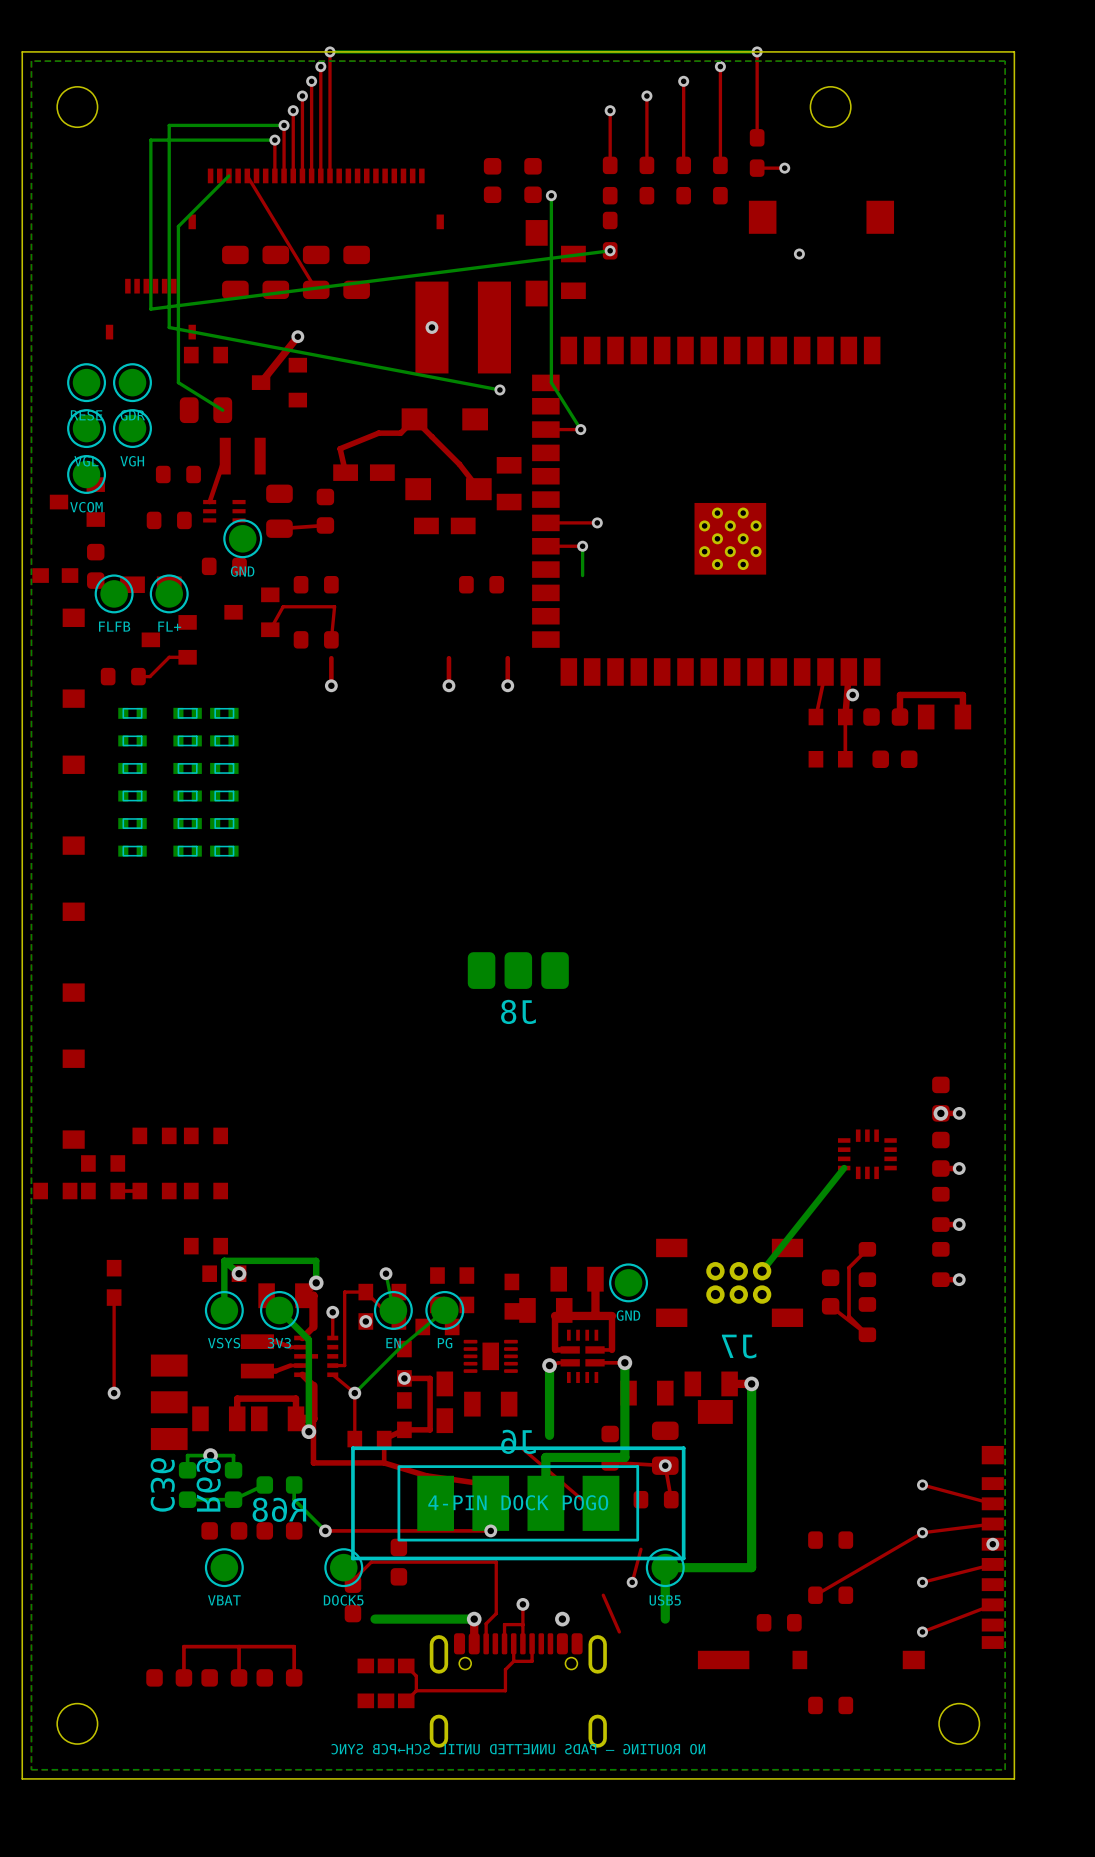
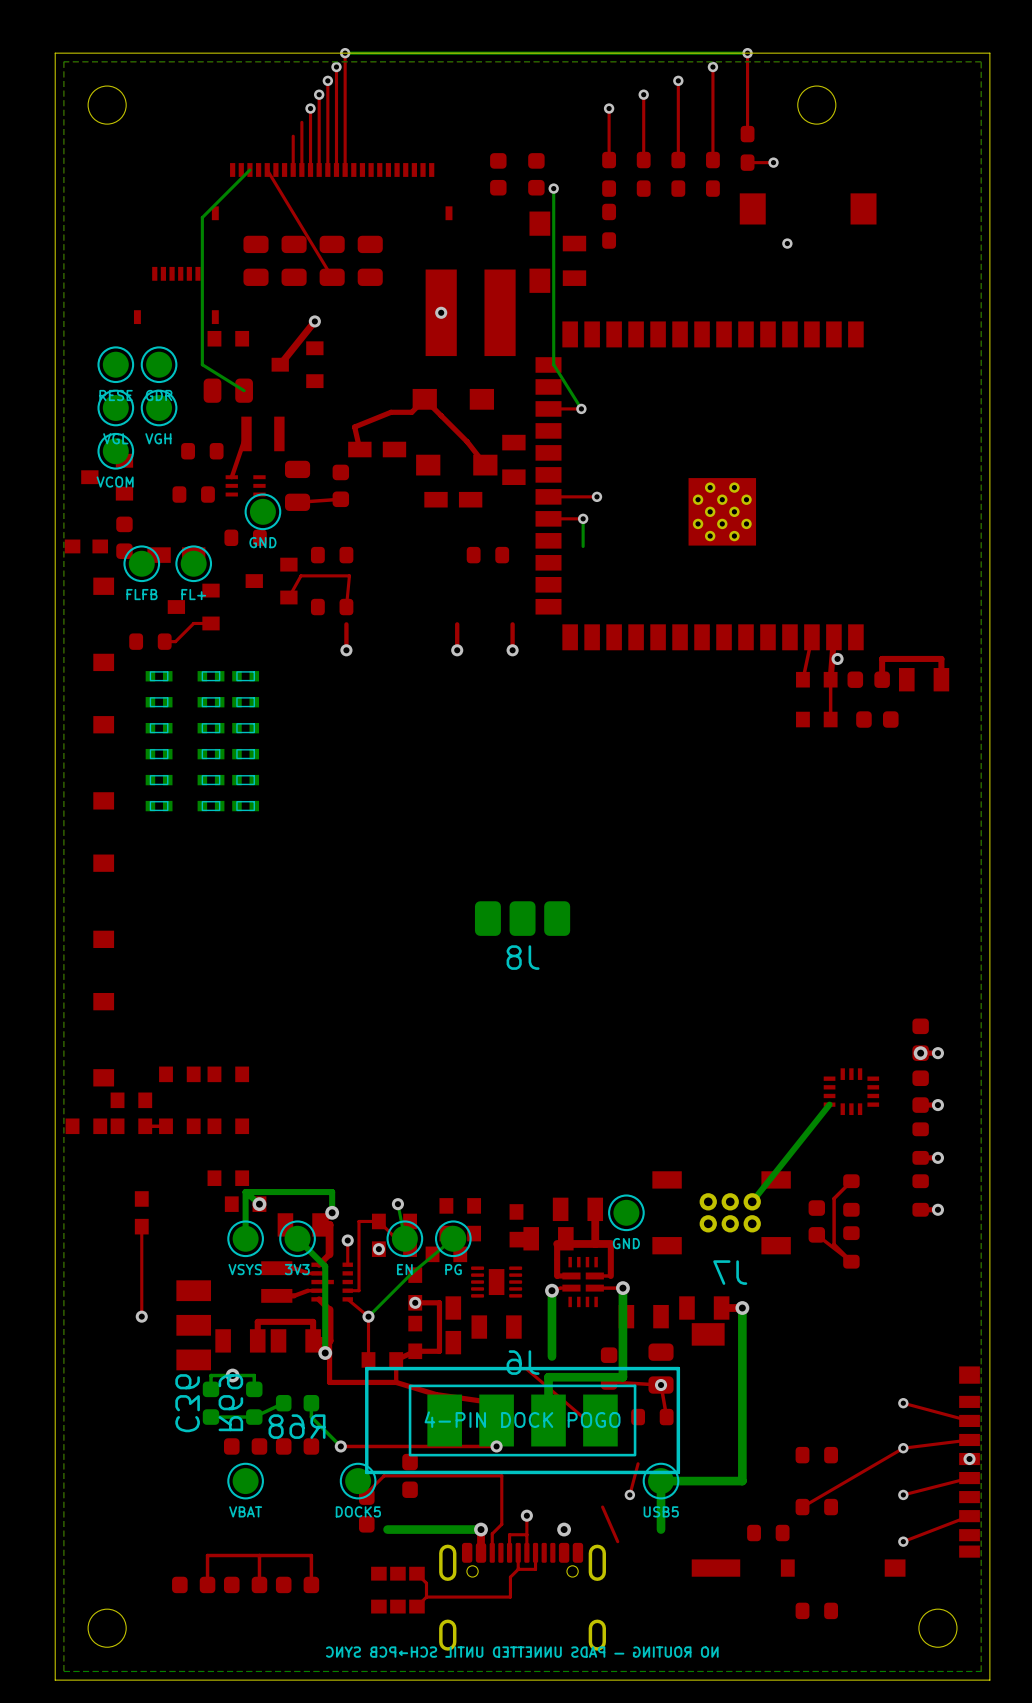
bottom track: (284, 125) (169, 125) (169, 327) (499, 389) -> none
via: (284, 125) -> none
bottom track: (274, 140) (150, 140) (150, 309) (610, 250) -> none
via: (274, 140) -> none
via: (610, 250) -> none
via: (499, 389) -> none

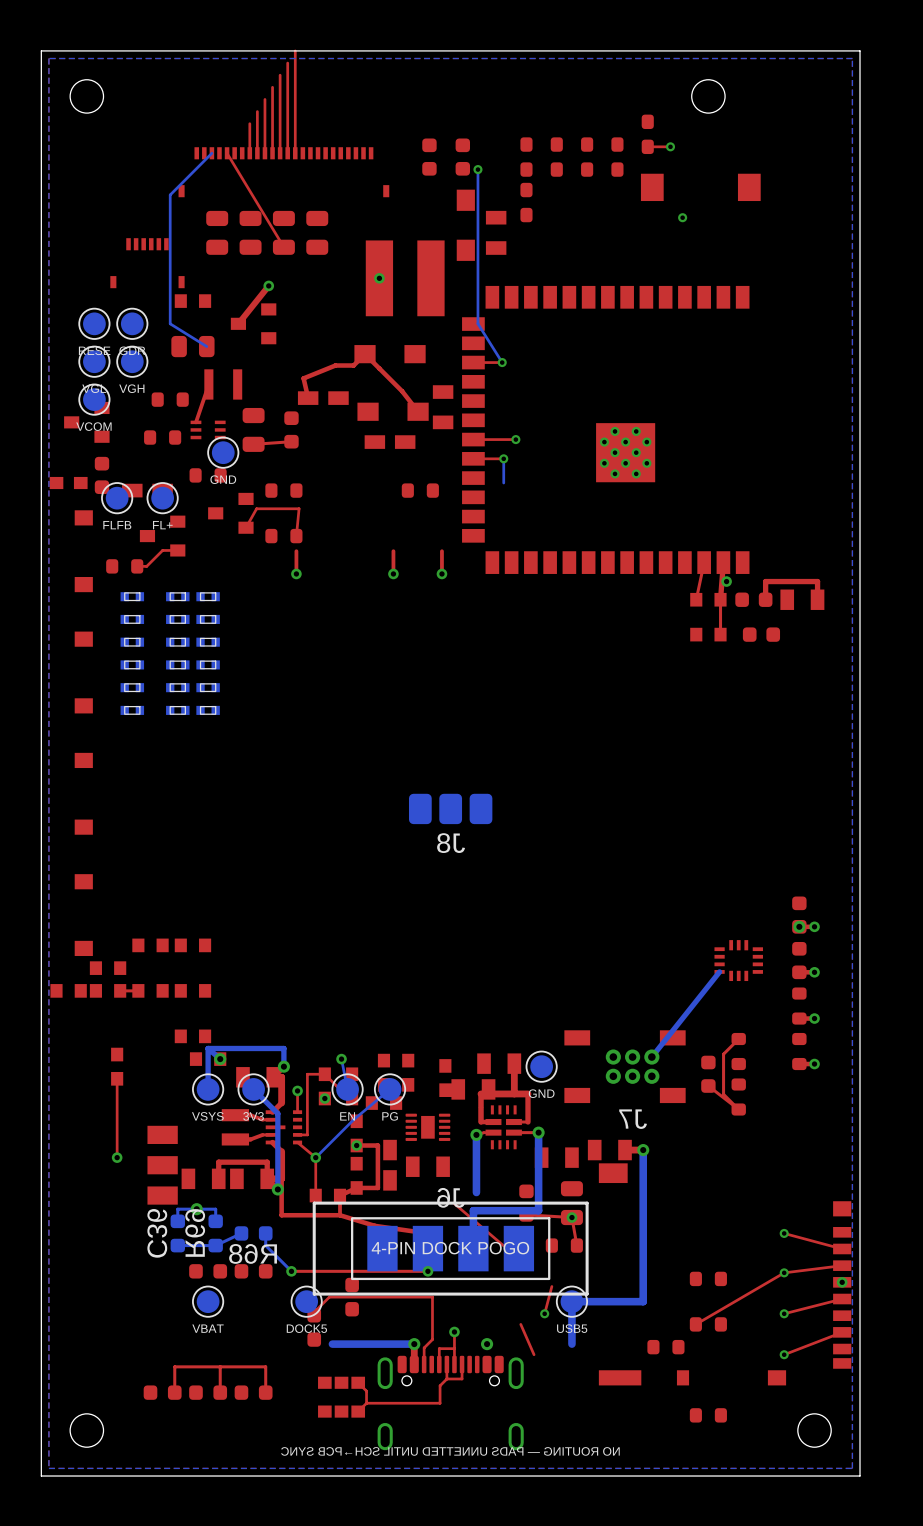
via: (345, 53) -> none
top track: (747, 53) (747, 134) -> none
bottom track: (747, 53) (345, 53) -> none
via: (747, 53) -> none
via: (336, 67) -> none
top track: (712, 67) (712, 160) -> none
via: (712, 67) -> none
via: (327, 80) -> none
top track: (678, 80) (678, 160) -> none
via: (678, 80) -> none
via: (319, 94) -> none
top track: (643, 94) (643, 160) -> none
via: (643, 94) -> none
via: (310, 108) -> none
top track: (609, 108) (609, 160) -> none
via: (609, 108) -> none

